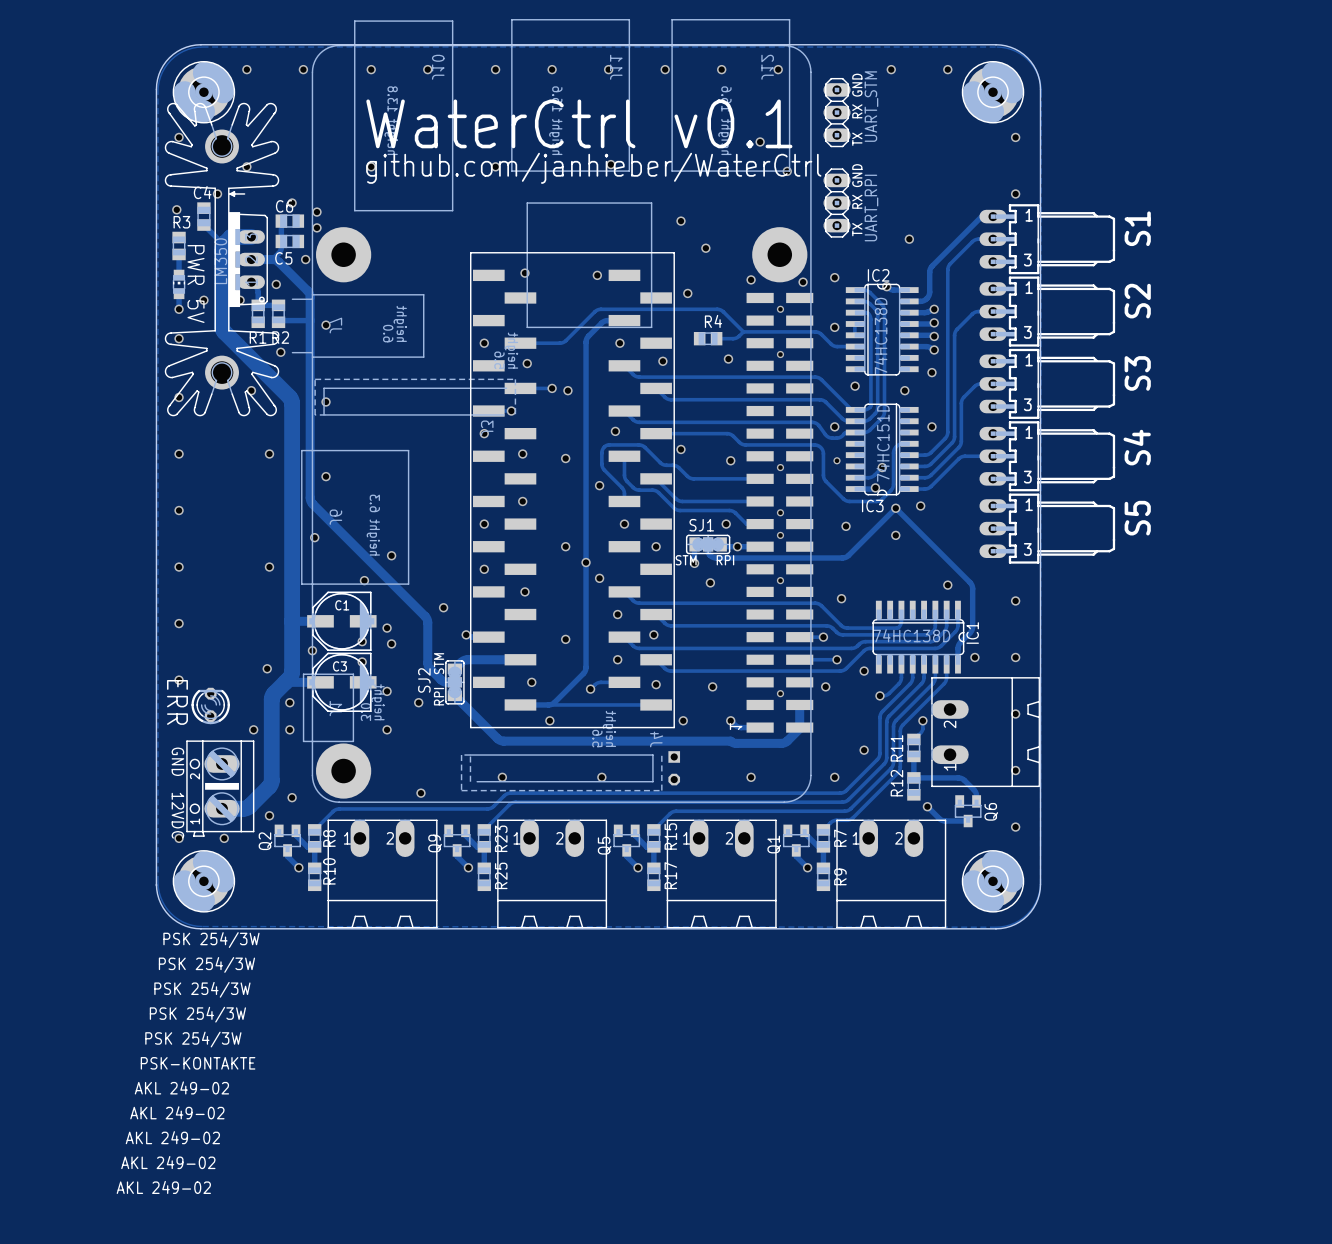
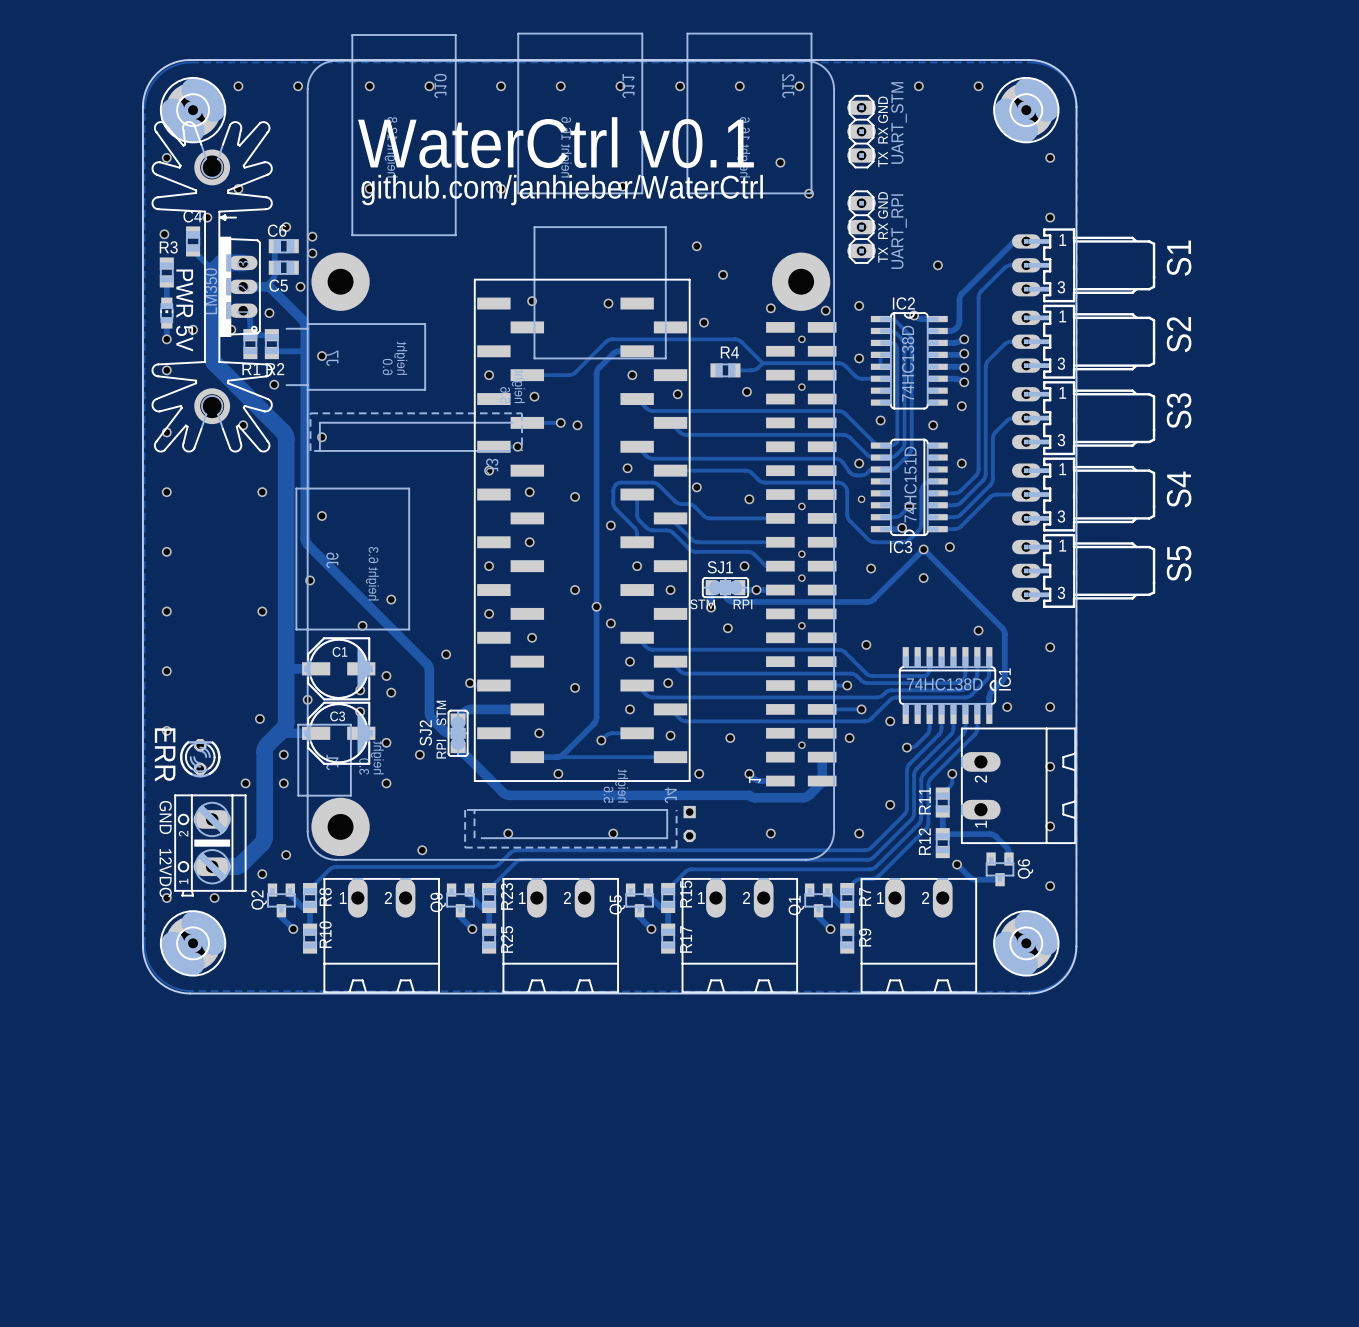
drawing: [116, 932, 260, 1194] -> none

